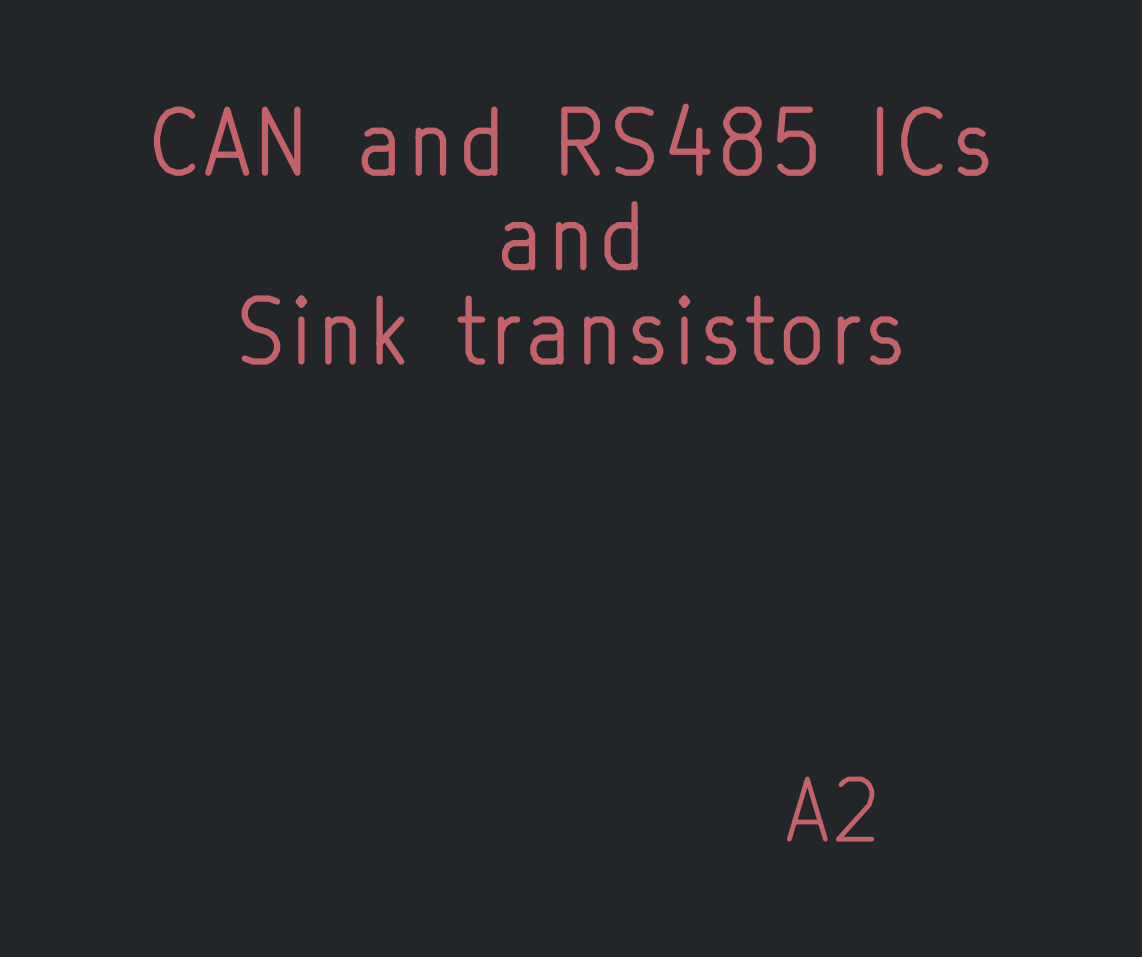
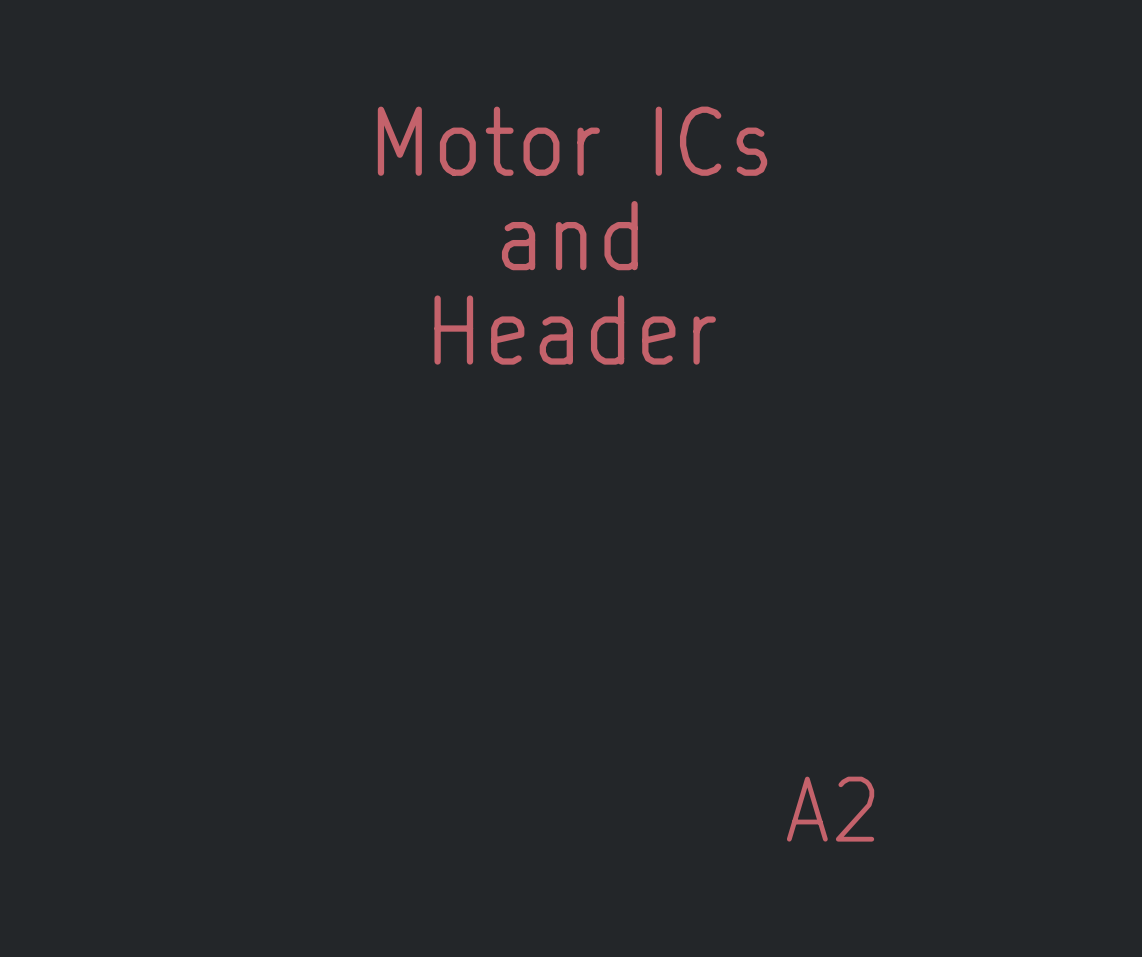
text: CAN and RS485 ICs (571, 139) -> Motor ICs (572, 141)
text: Sink transistors (571, 330) -> Header (575, 330)

